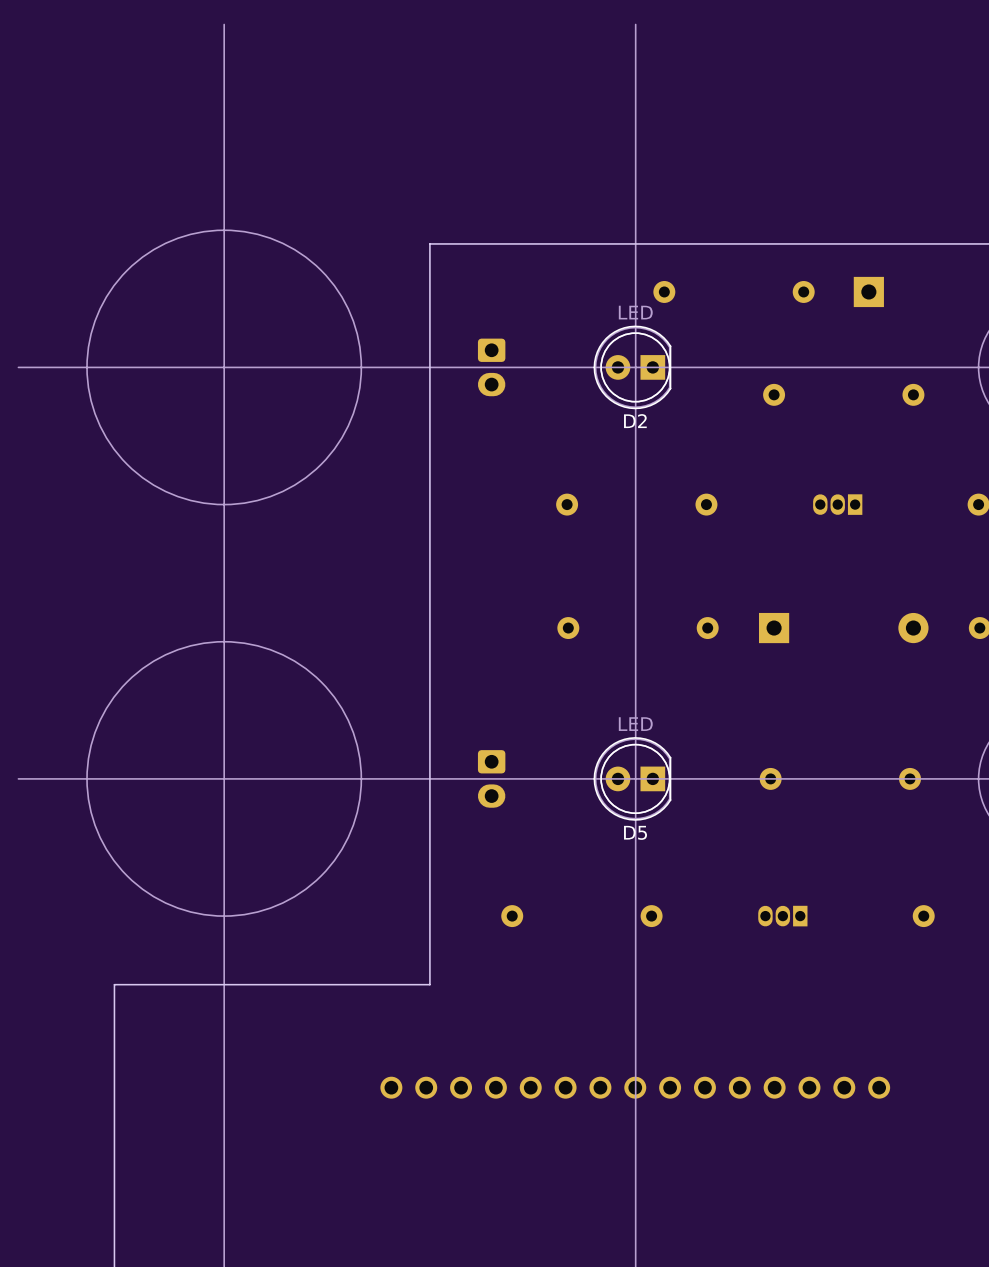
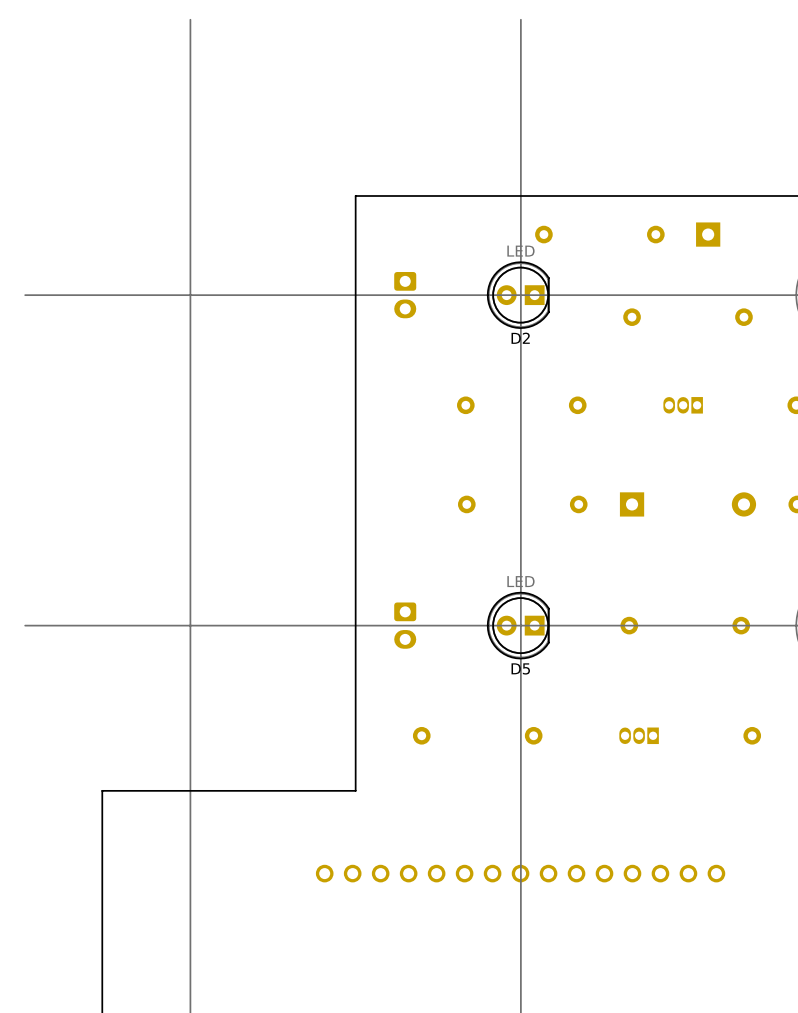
drawing: [86, 229, 363, 506] -> none
drawing: [86, 640, 363, 917] -> none

